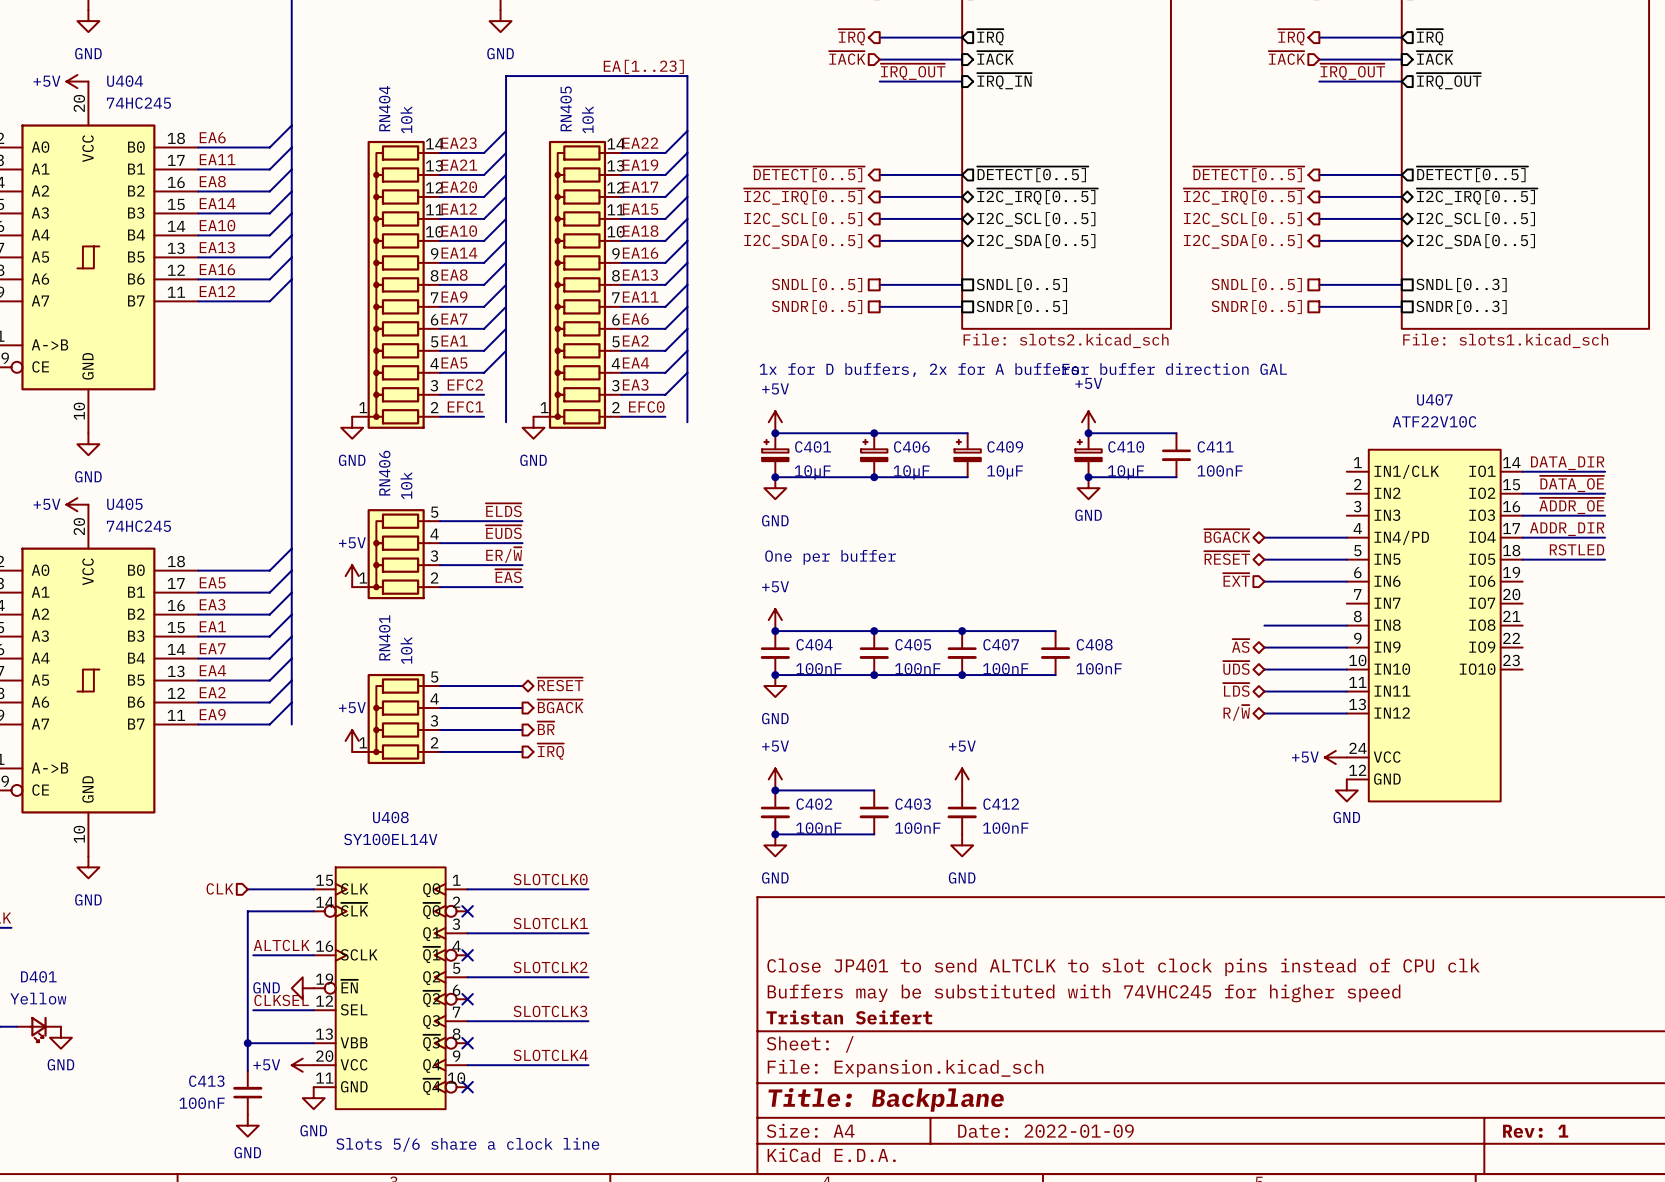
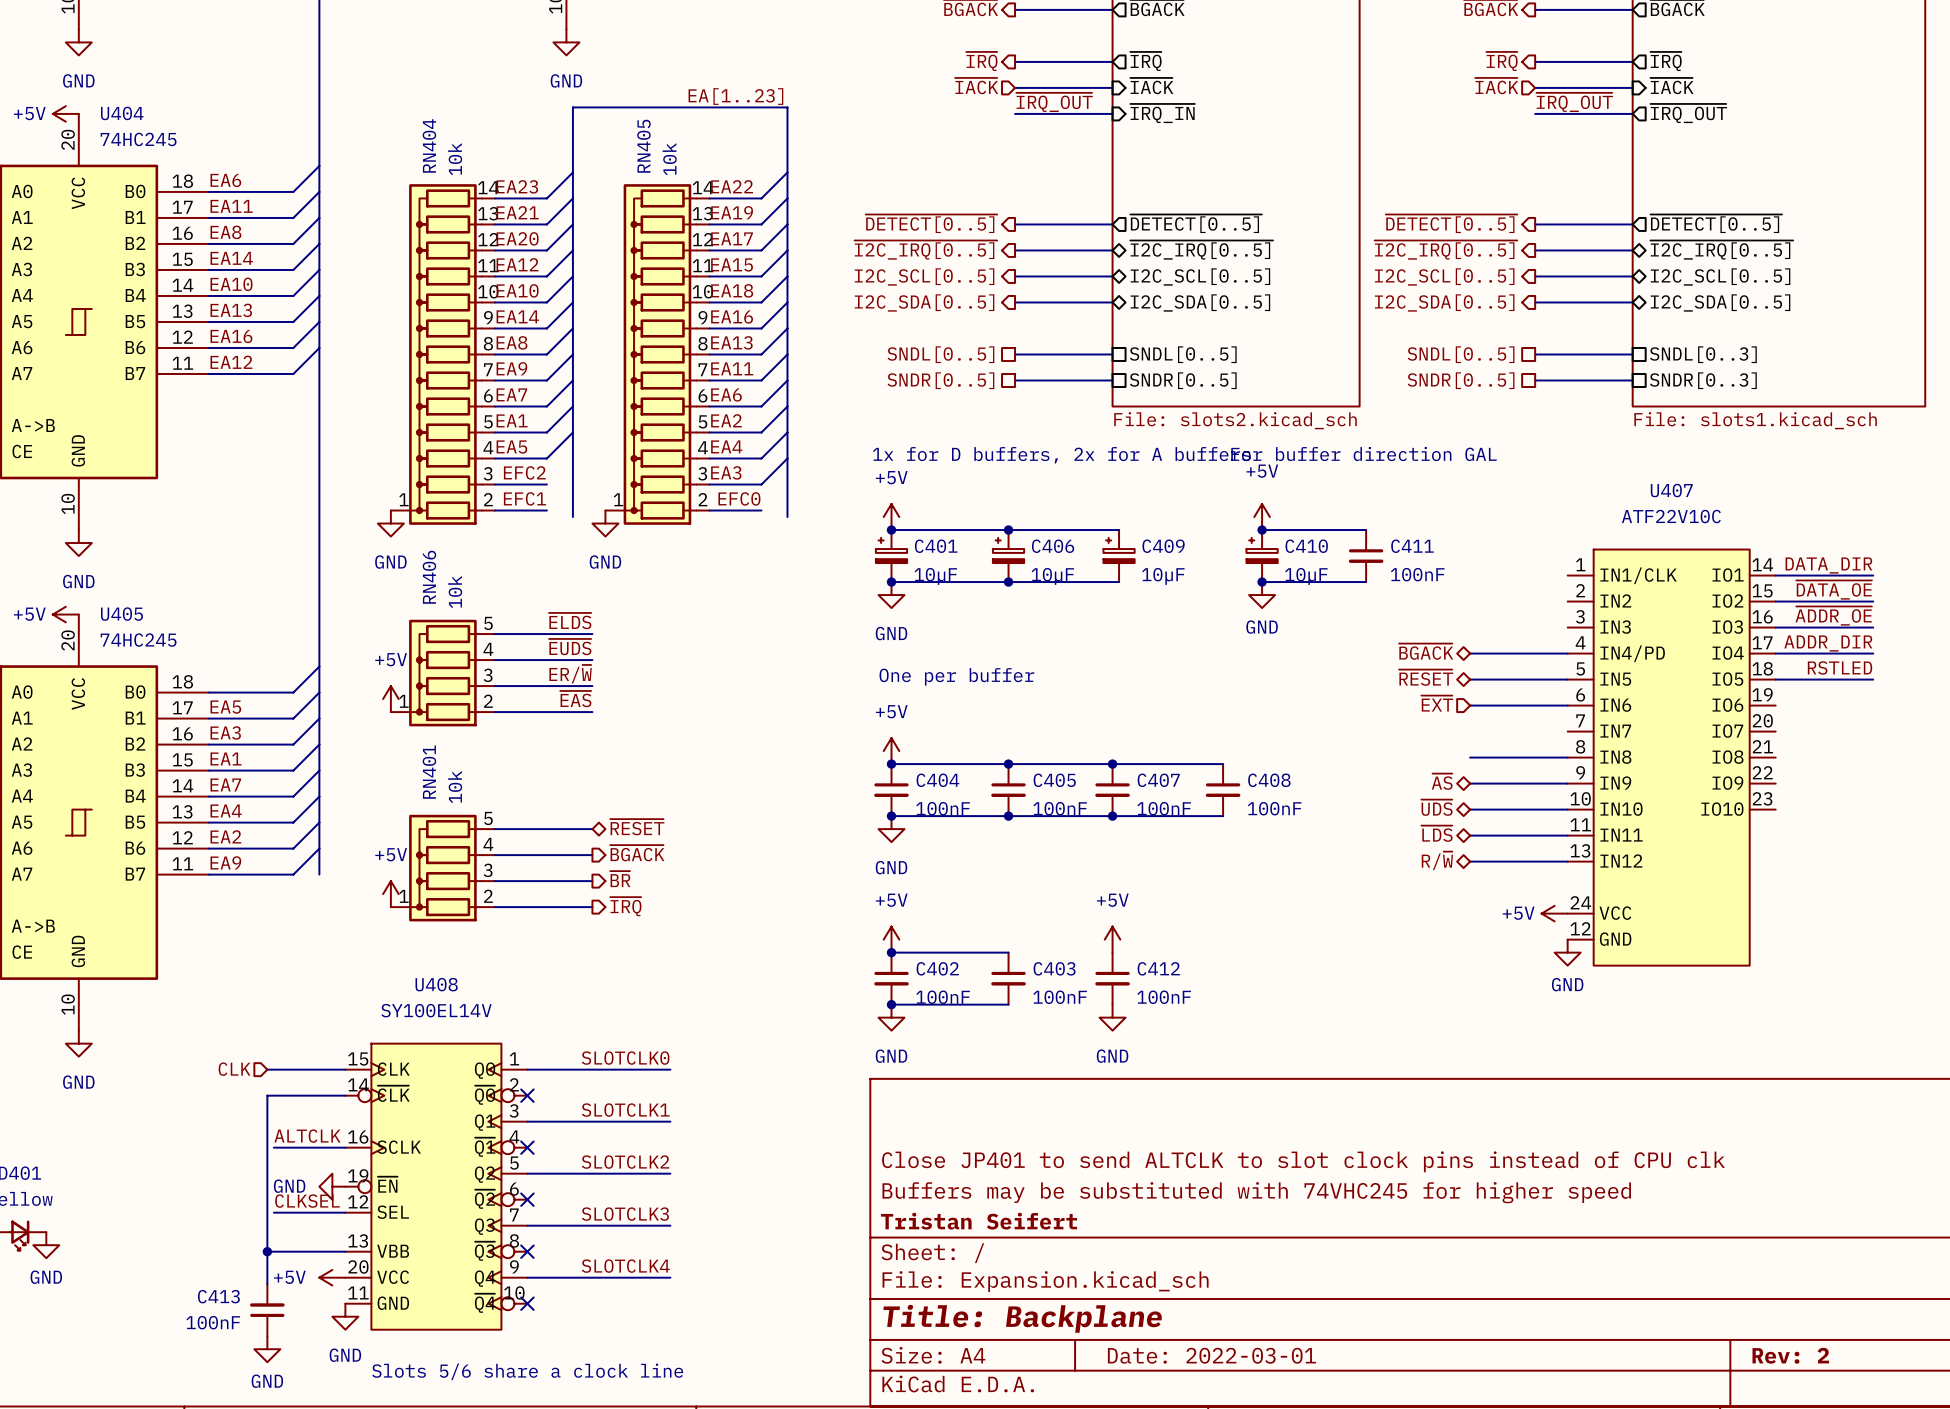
title block: Date: 2022-01-09 (1046, 1131) -> Date: 2022-03-01 (1211, 1355)
title block: Rev: 1 (1535, 1131) -> Rev: 2 (1790, 1355)

